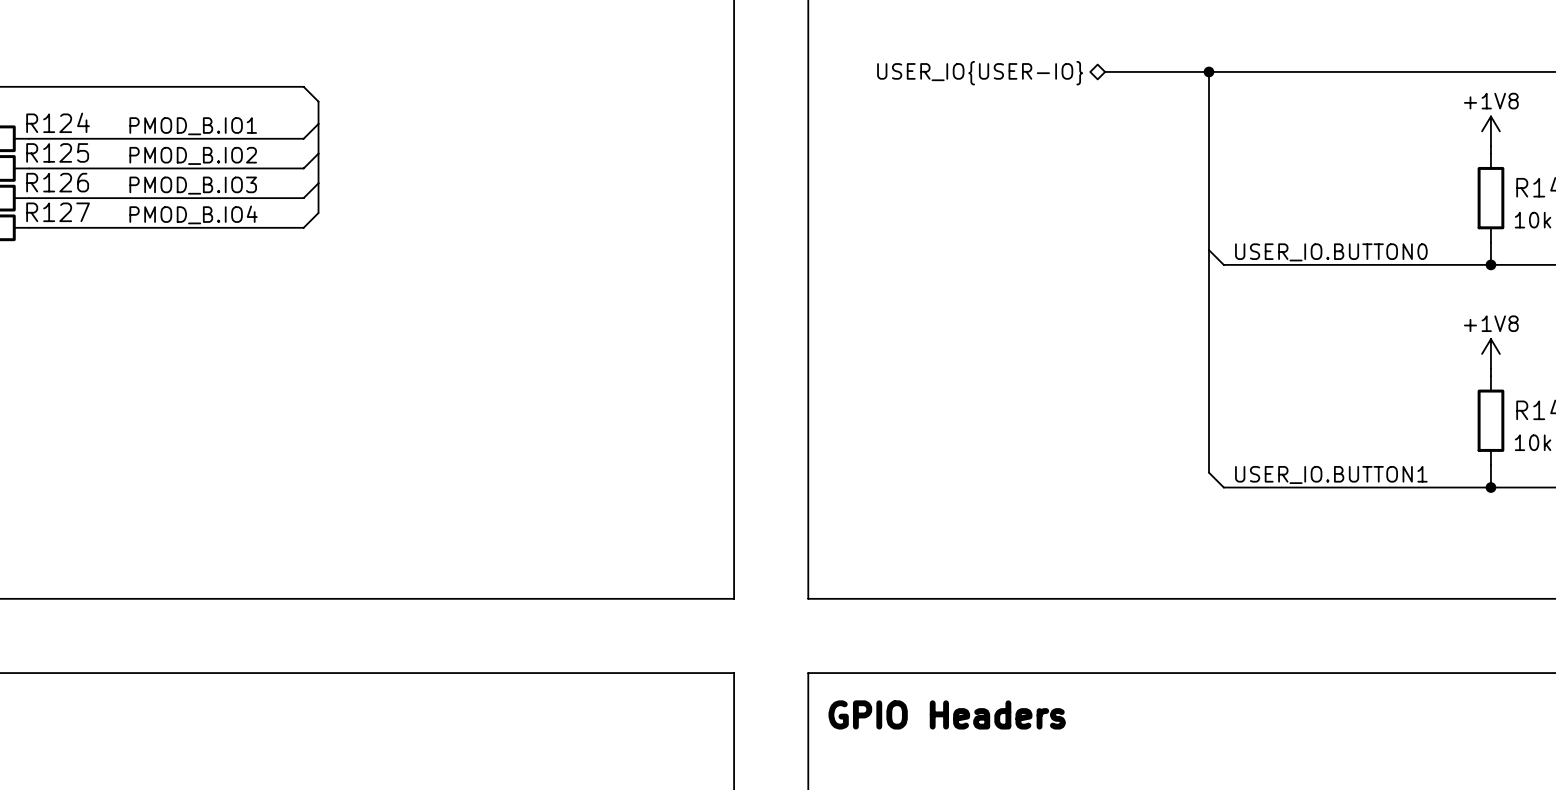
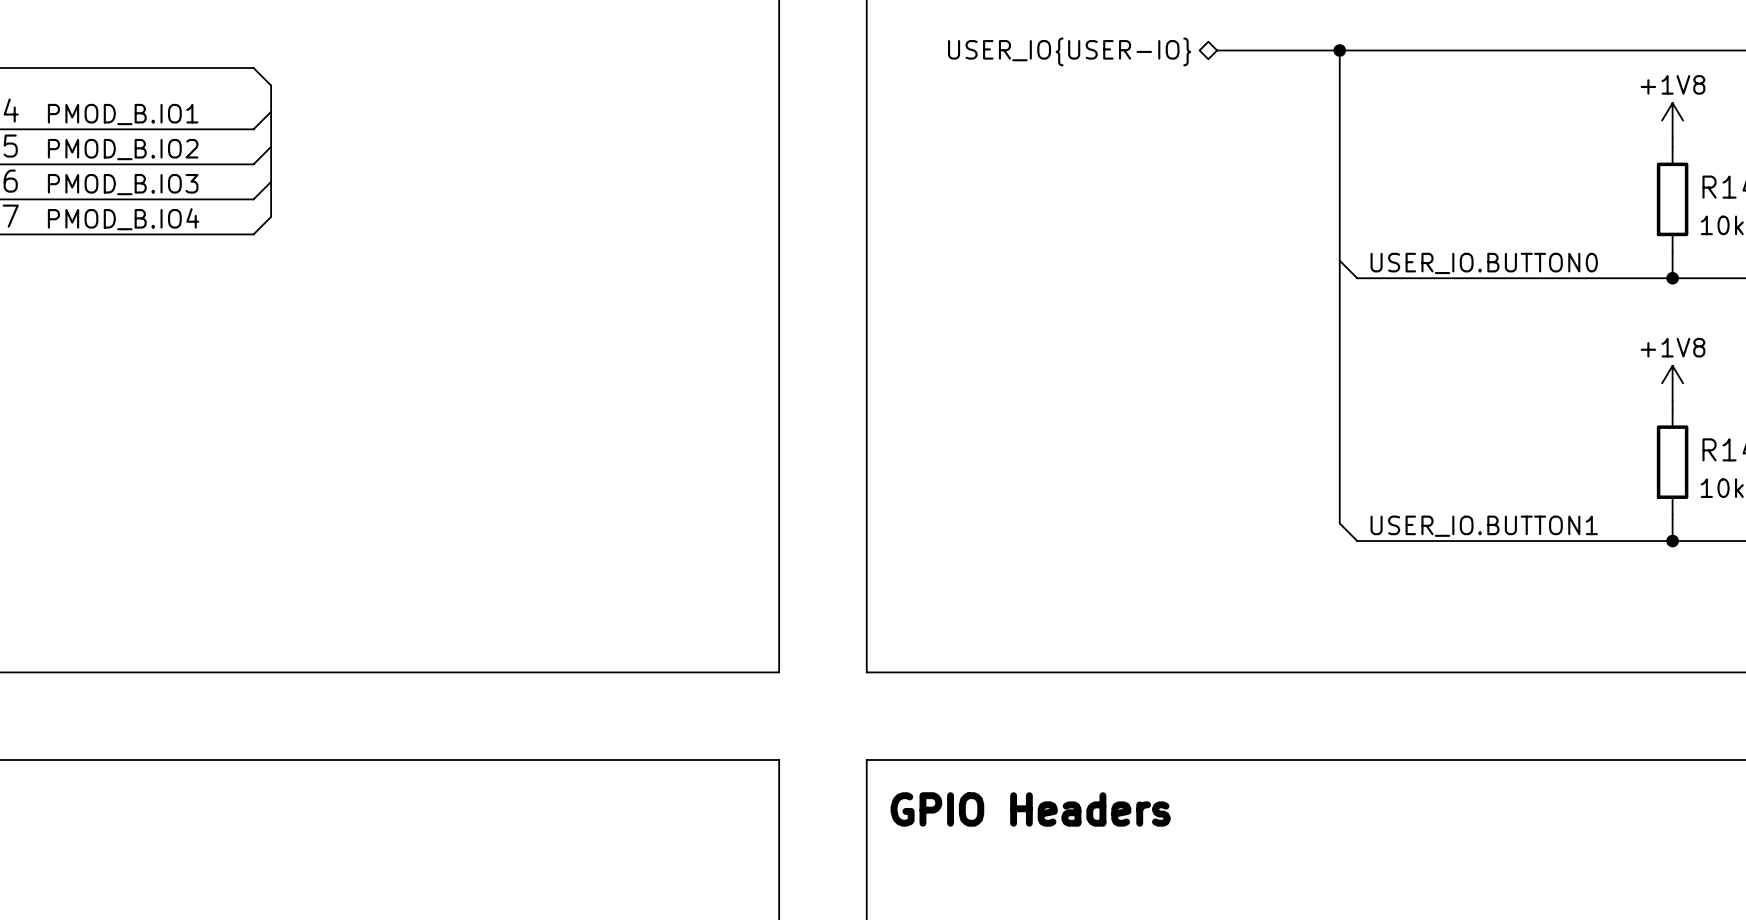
bus: (288, 86) (303, 86) (318, 101) (318, 212) -> (253, 68) (271, 85) (271, 216)
wire: (318, 123) (303, 138) (288, 138) -> (271, 111) (253, 129)
label position: PMOD_B.IO1 (193, 126) -> PMOD_B.IO1 (123, 114)
wire: (318, 153) (303, 168) (288, 168) -> (271, 146) (253, 164)
label position: PMOD_B.IO2 (193, 155) -> PMOD_B.IO2 (123, 149)
wire: (318, 183) (303, 198) (288, 198) -> (271, 181) (253, 199)
label position: PMOD_B.IO3 (193, 185) -> PMOD_B.IO3 (123, 184)
wire: (318, 212) (303, 227) (288, 227) -> (271, 216) (253, 234)
label position: PMOD_B.IO4 (193, 214) -> PMOD_B.IO4 (123, 219)

